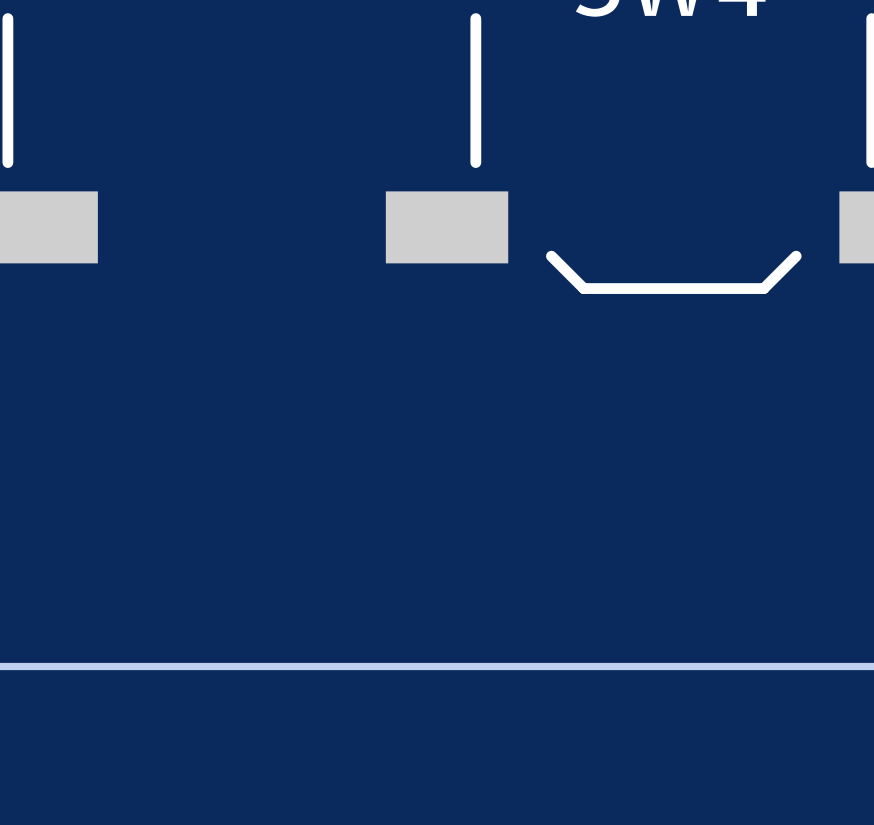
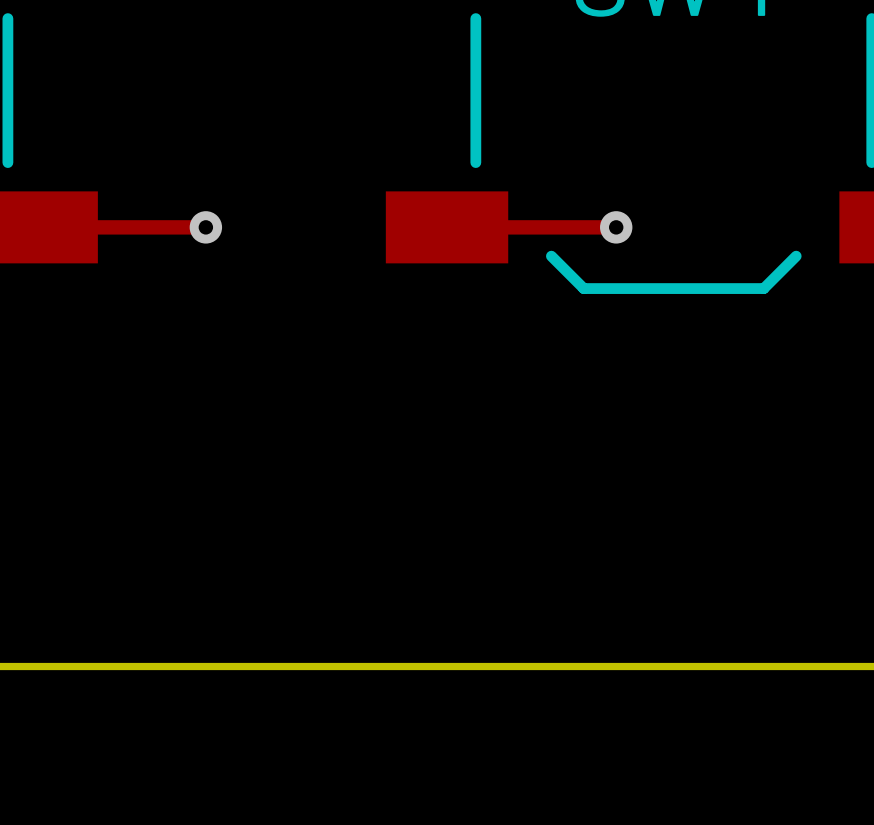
track: none -> (36, 227) (205, 227)
via: none -> (205, 227)
track: none -> (447, 227) (616, 227)
via: none -> (616, 227)

